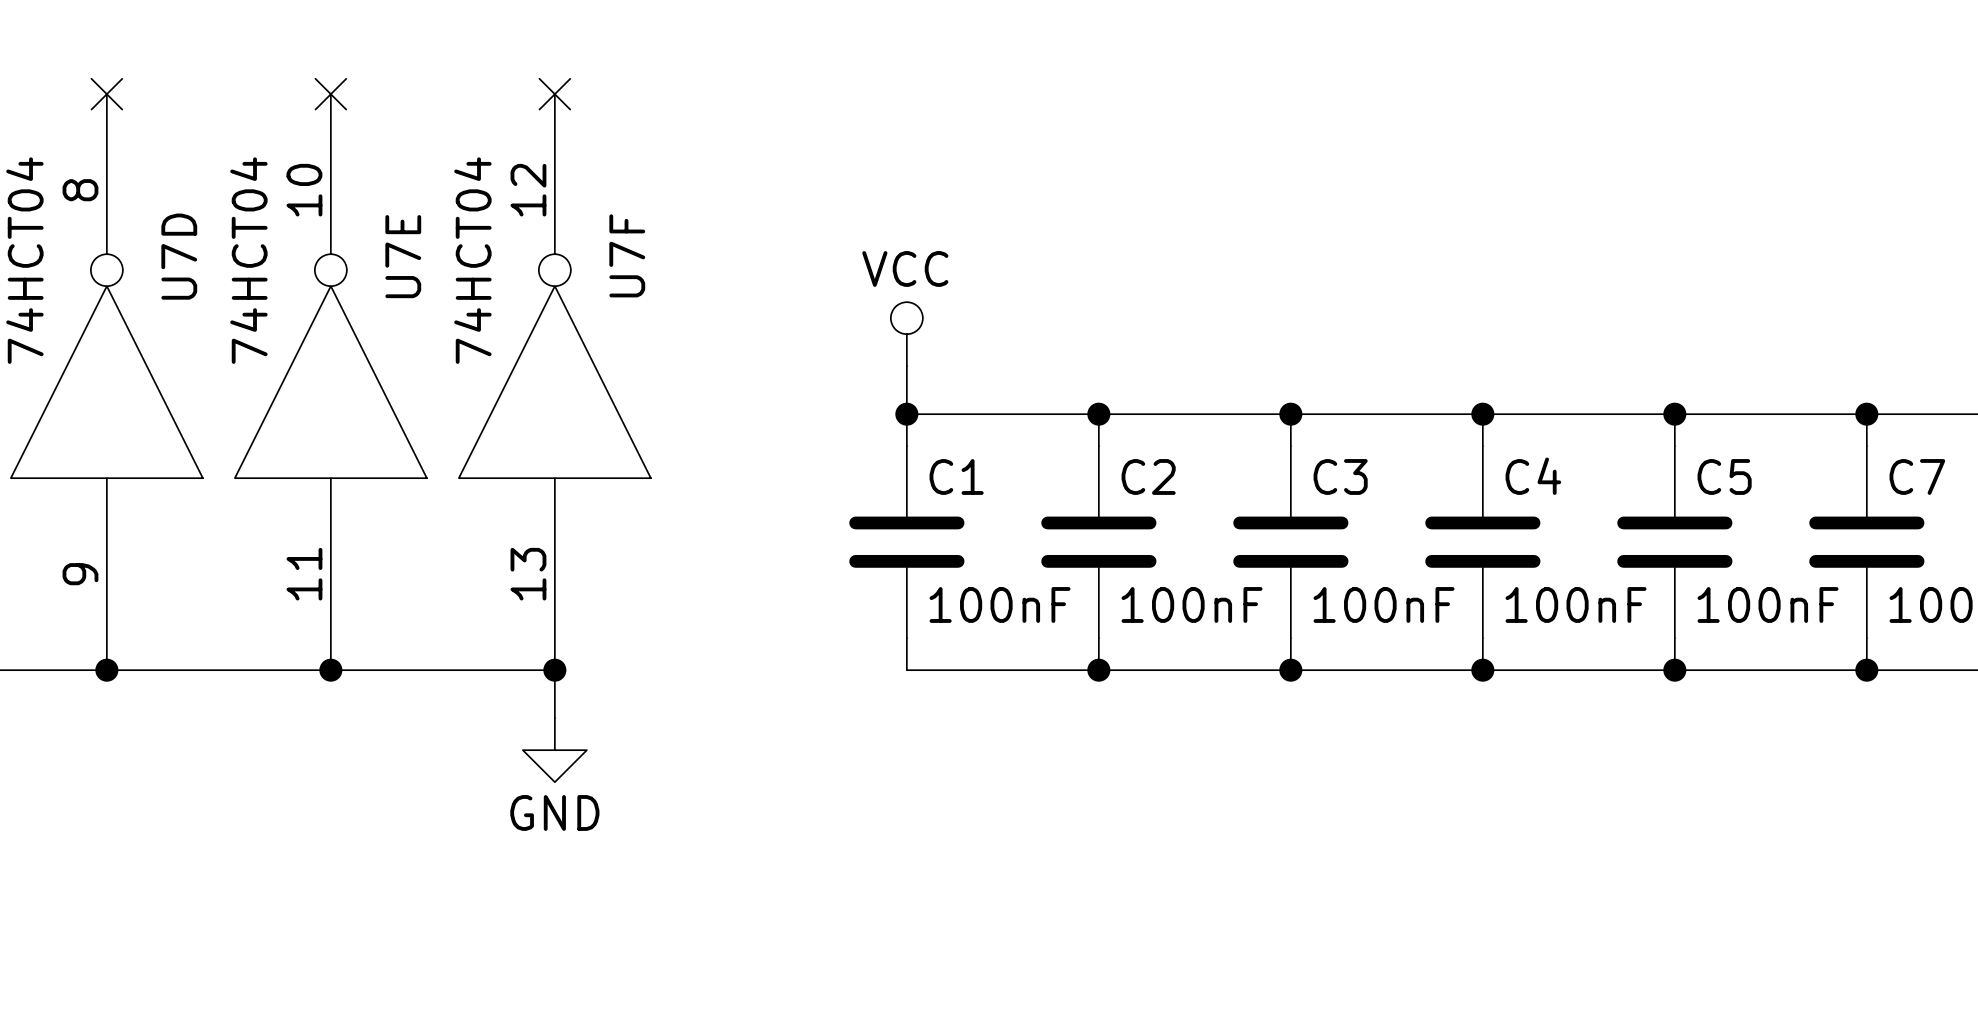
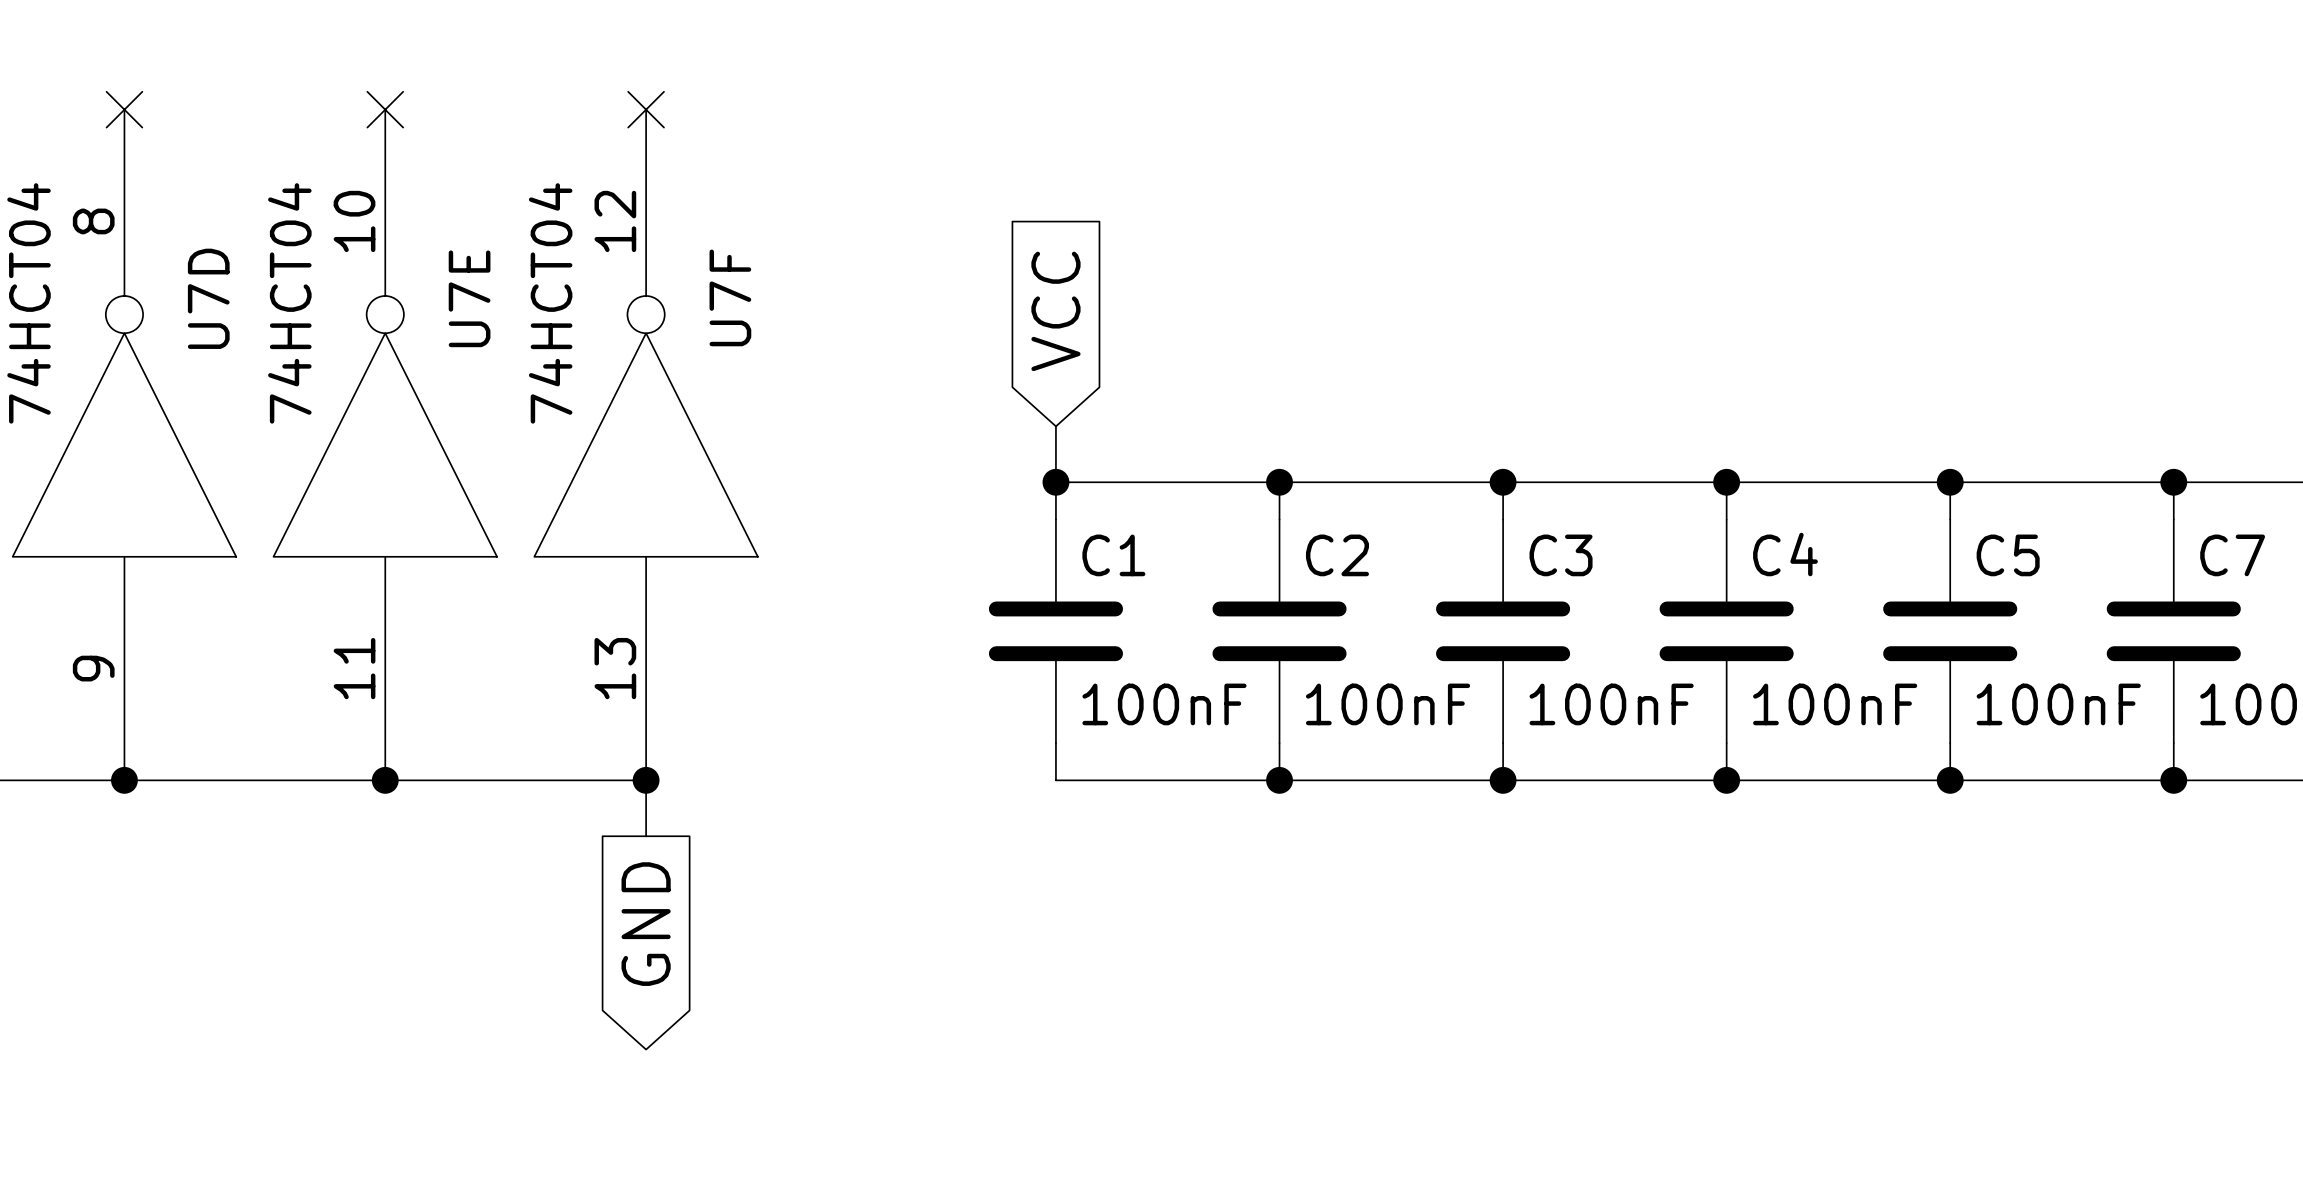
global label: none -> VCC (1055, 311)
power symbol: VCC (906, 334) -> none
power symbol: GND (554, 750) -> none
global label: none -> GND (646, 924)

